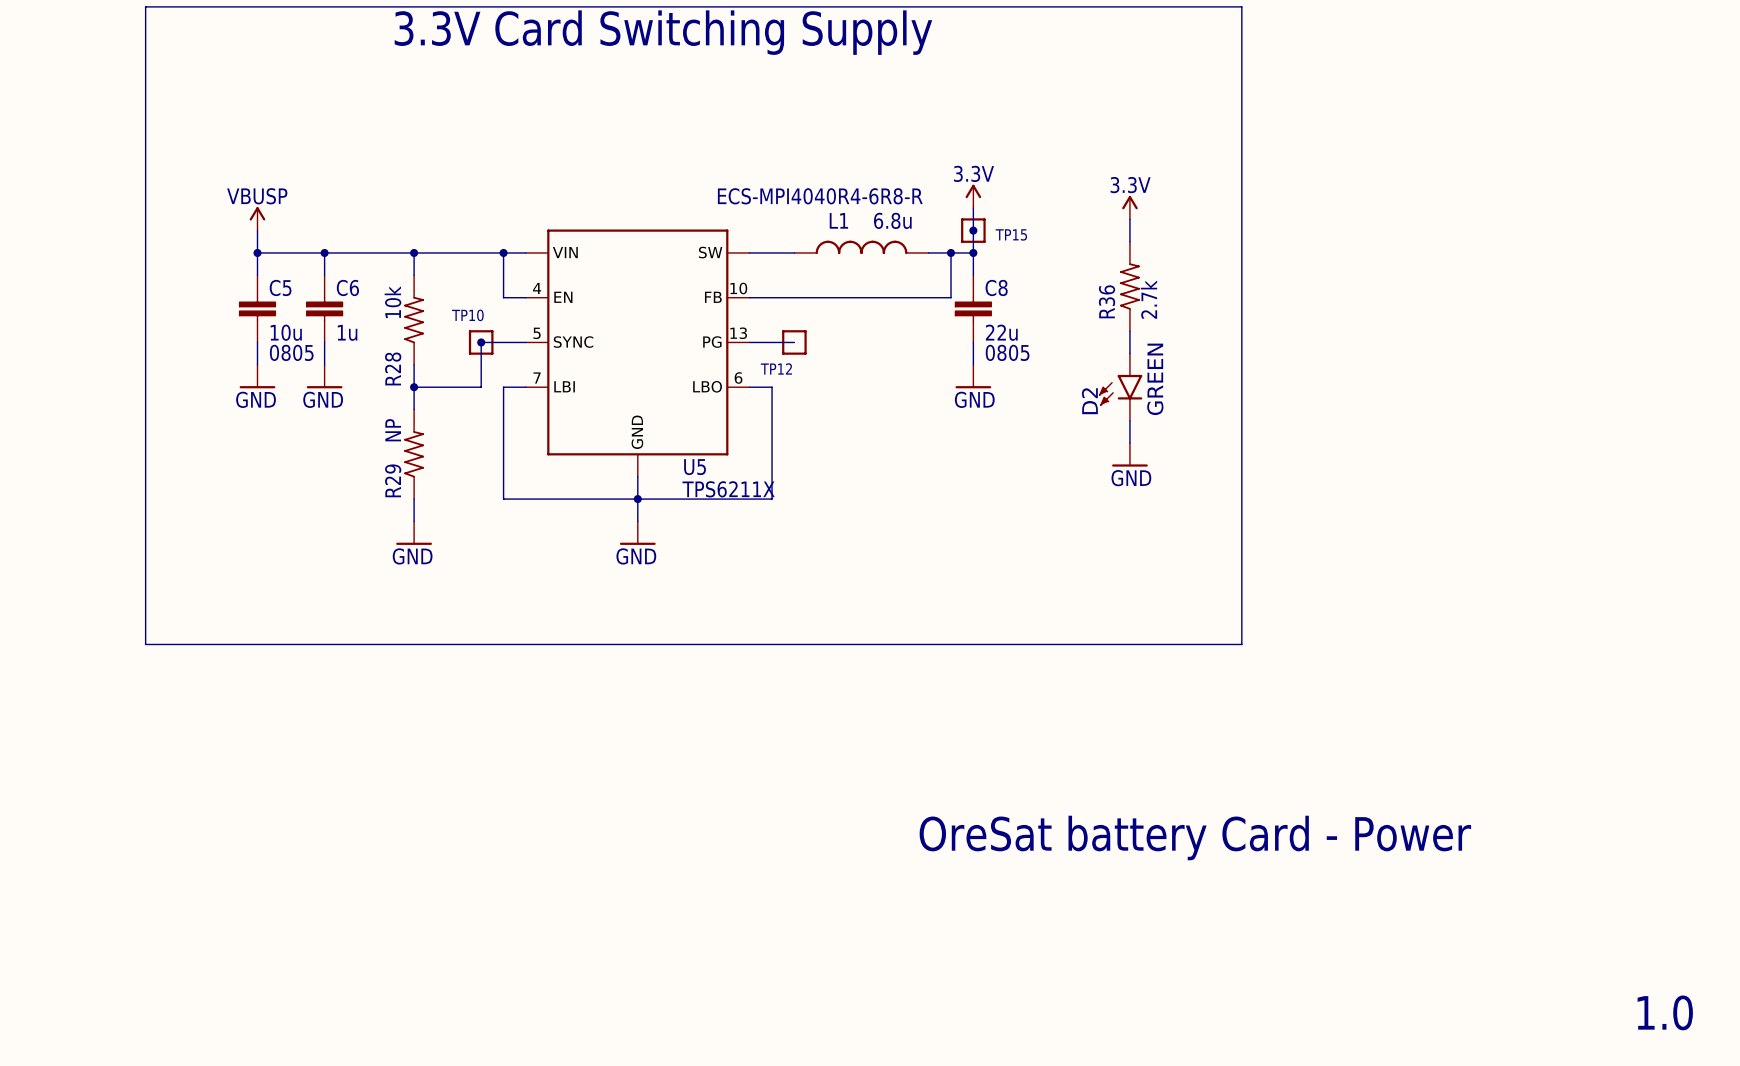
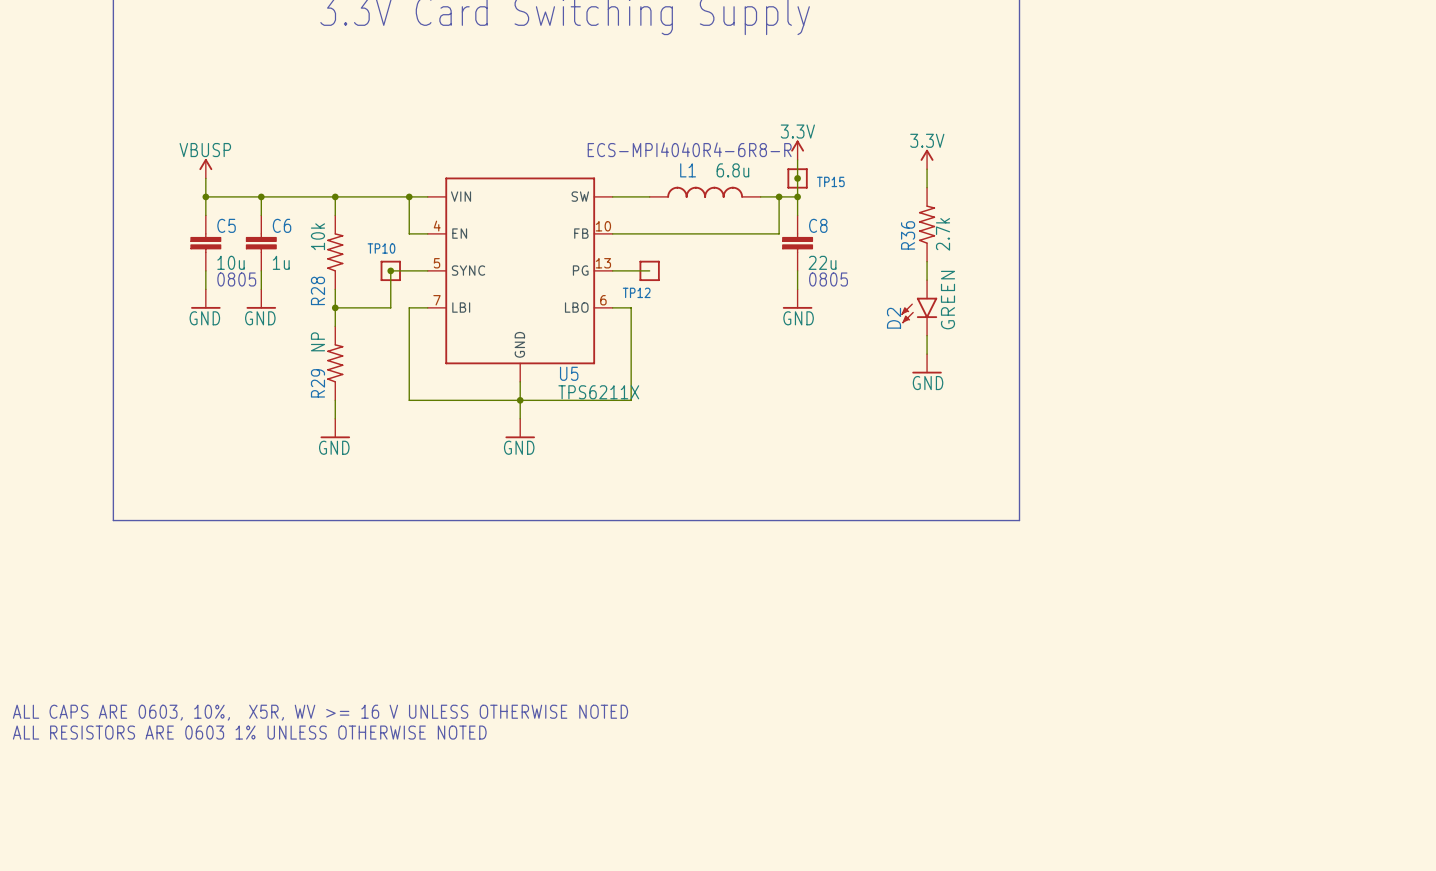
text: OreSat battery Card - Power (1195, 837) -> none
text: none -> ALL CAPS ARE 0603, 10%, X5R, WV >= 16 V UNLESS OTHERWISE NOTED (320, 712)
text: none -> ALL RESISTORS ARE 0603 1% UNLESS OTHERWISE NOTED (249, 732)
text: 1.0 (1665, 1012) -> none

